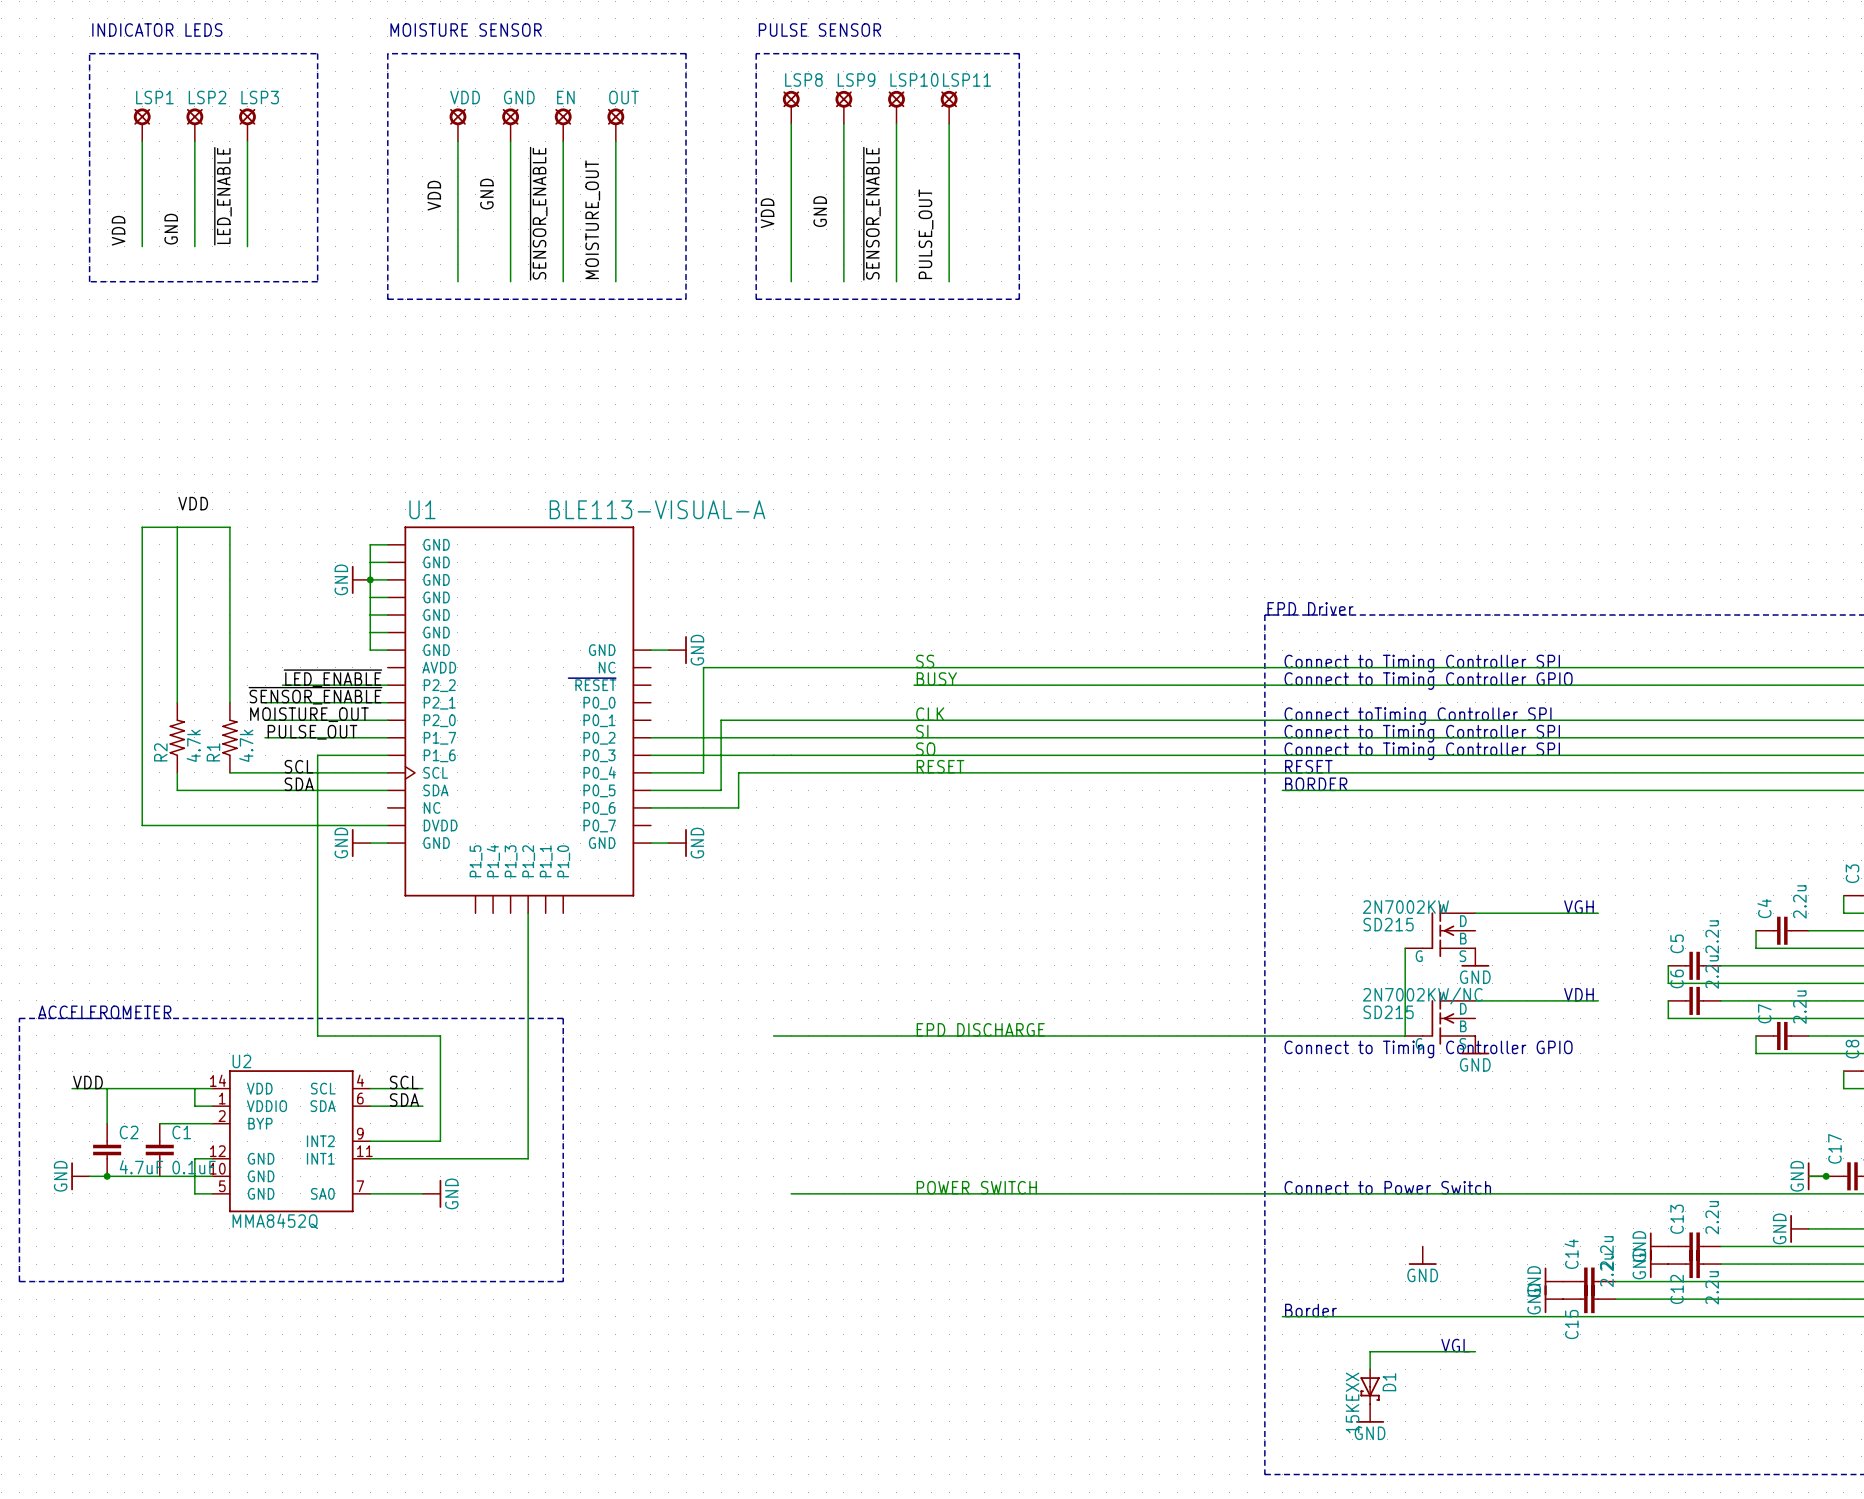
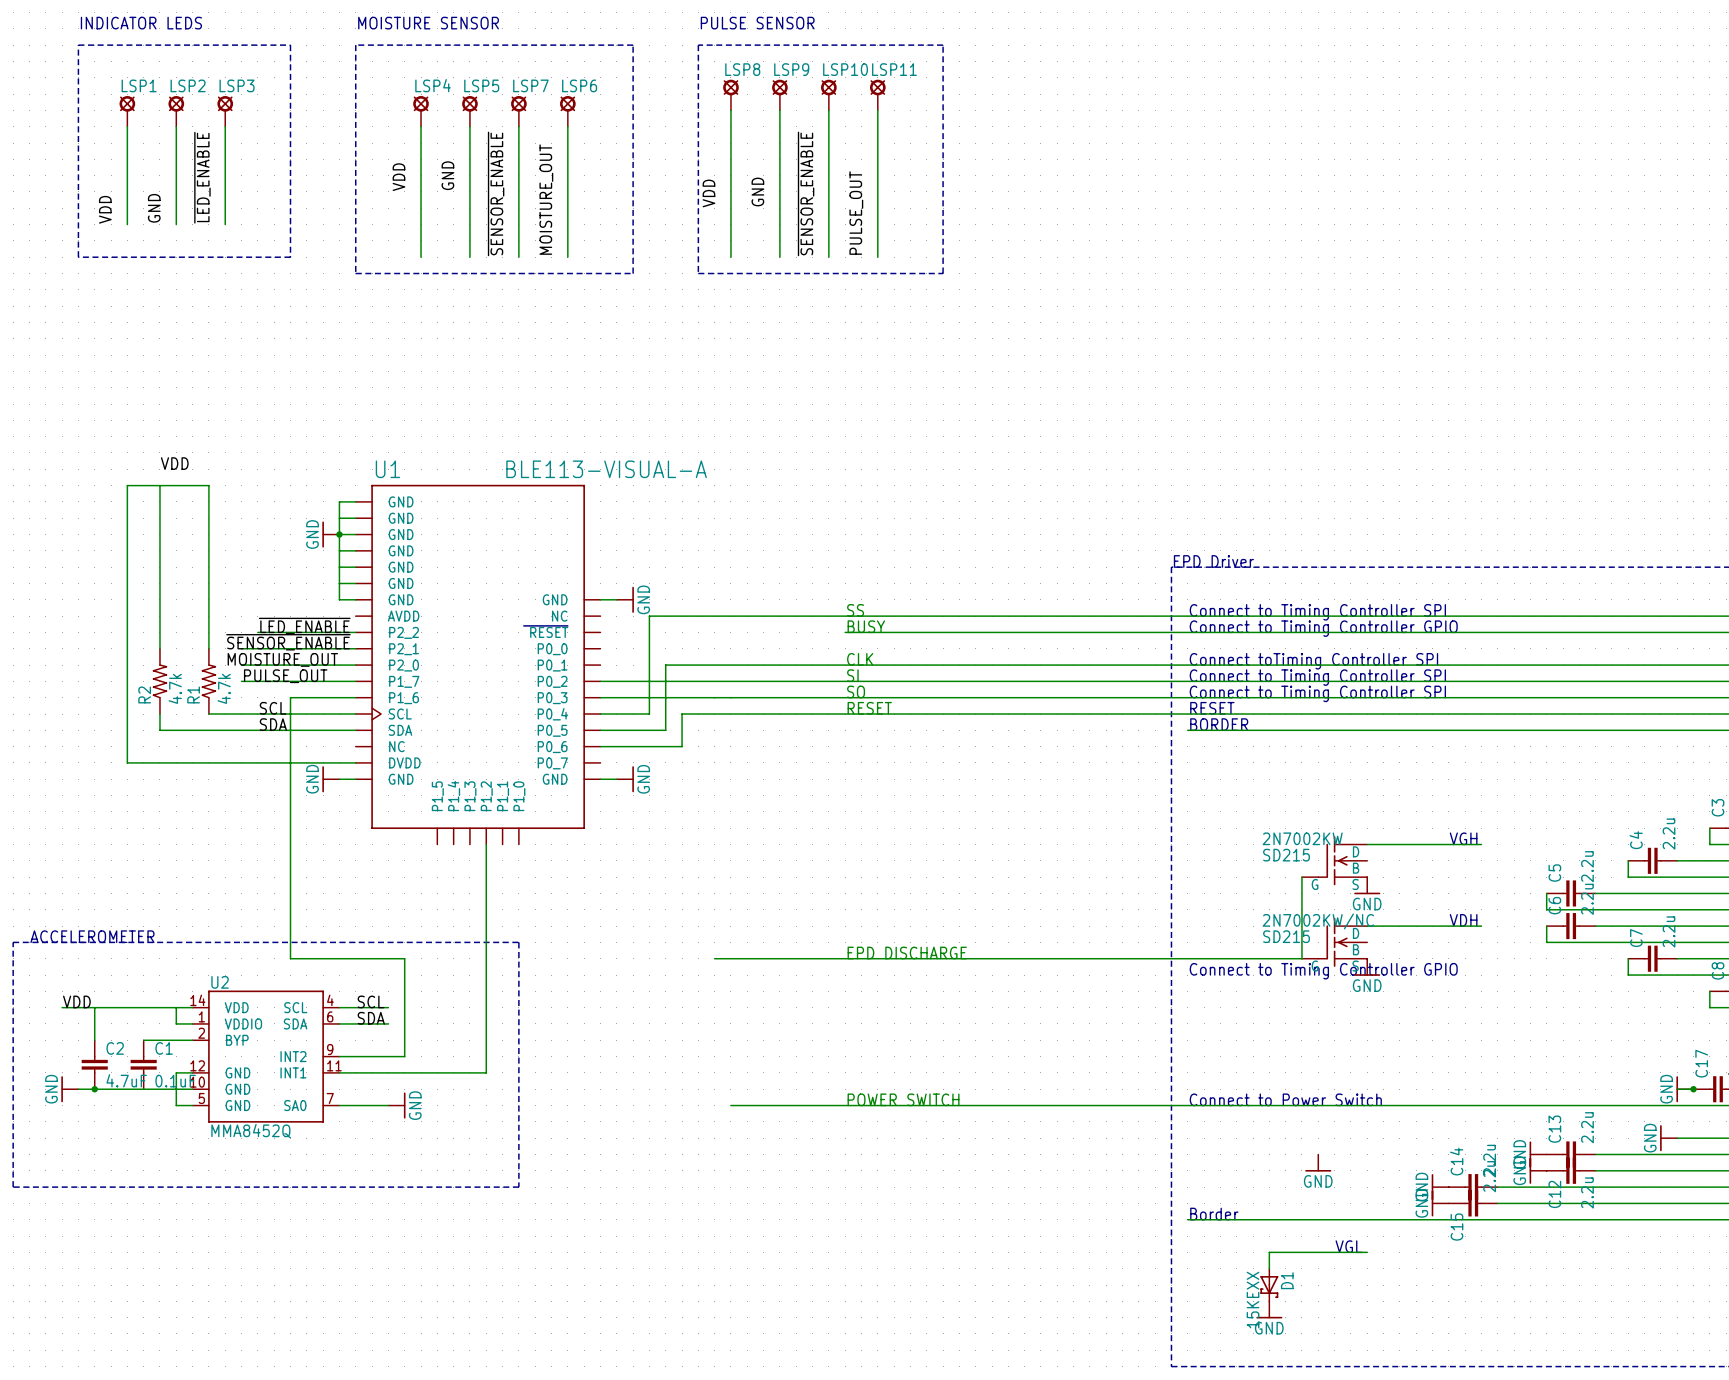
VDD name: VDD (465, 97) -> LSP4 (433, 85)
GND name: GND (519, 97) -> LSP5 (481, 85)
EN name: EN (565, 97) -> LSP7 (530, 85)
OUT name: OUT (624, 97) -> LSP6 (579, 85)

